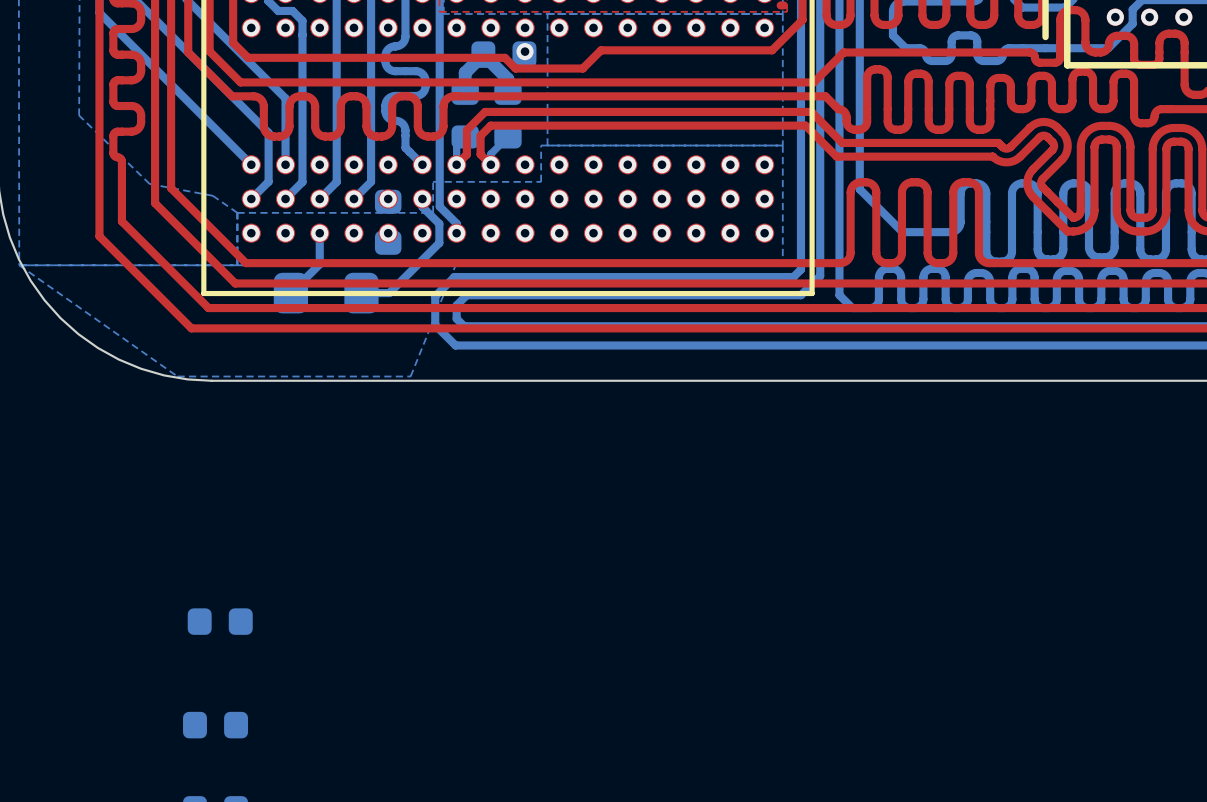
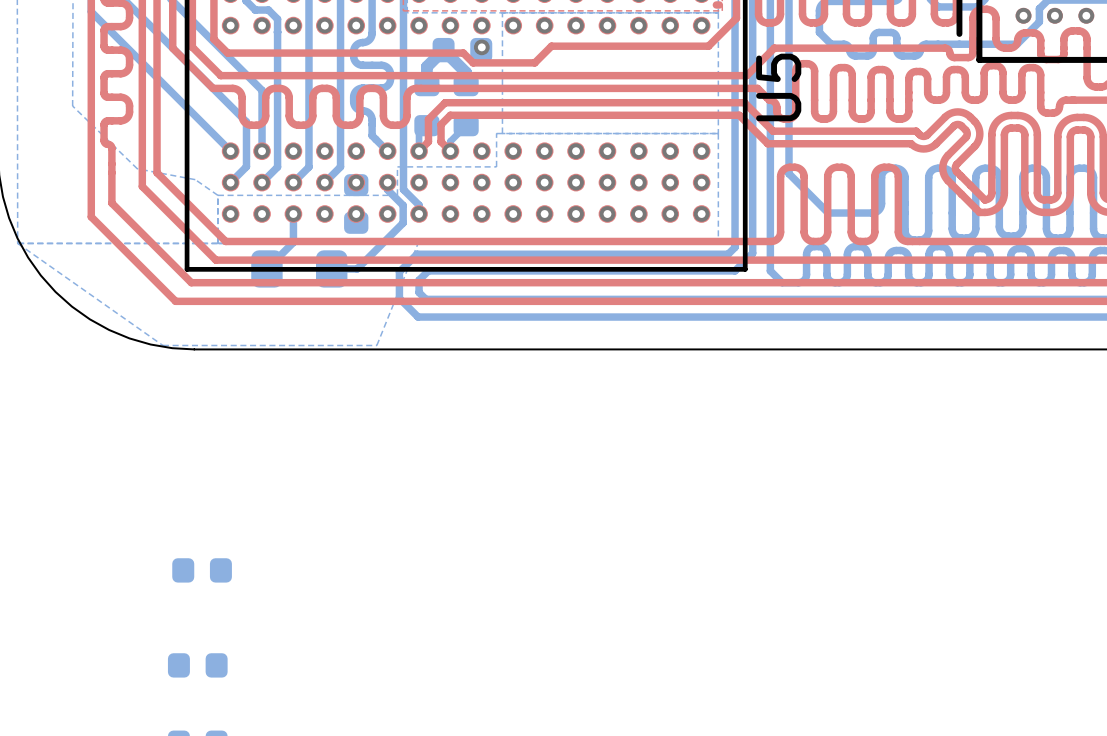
U5 name: none -> U5 (778, 87)

